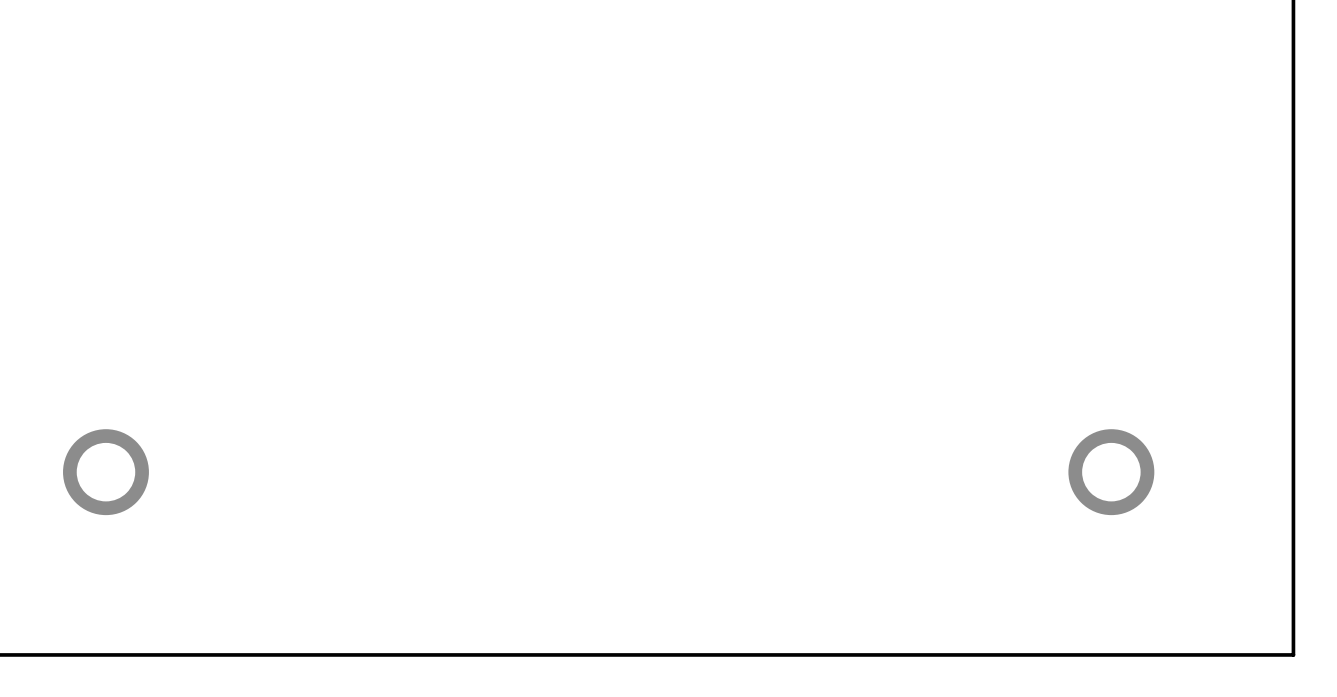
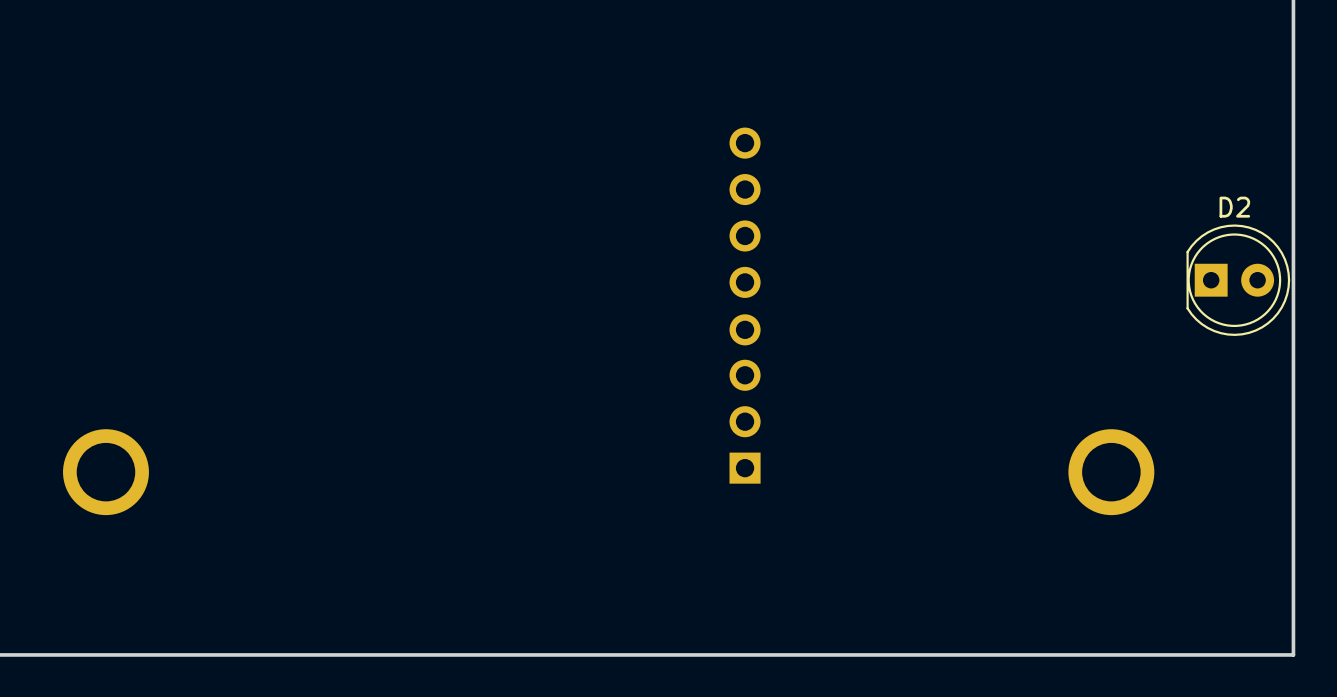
D2: none -> (1238, 280)
part: none -> (745, 305)

